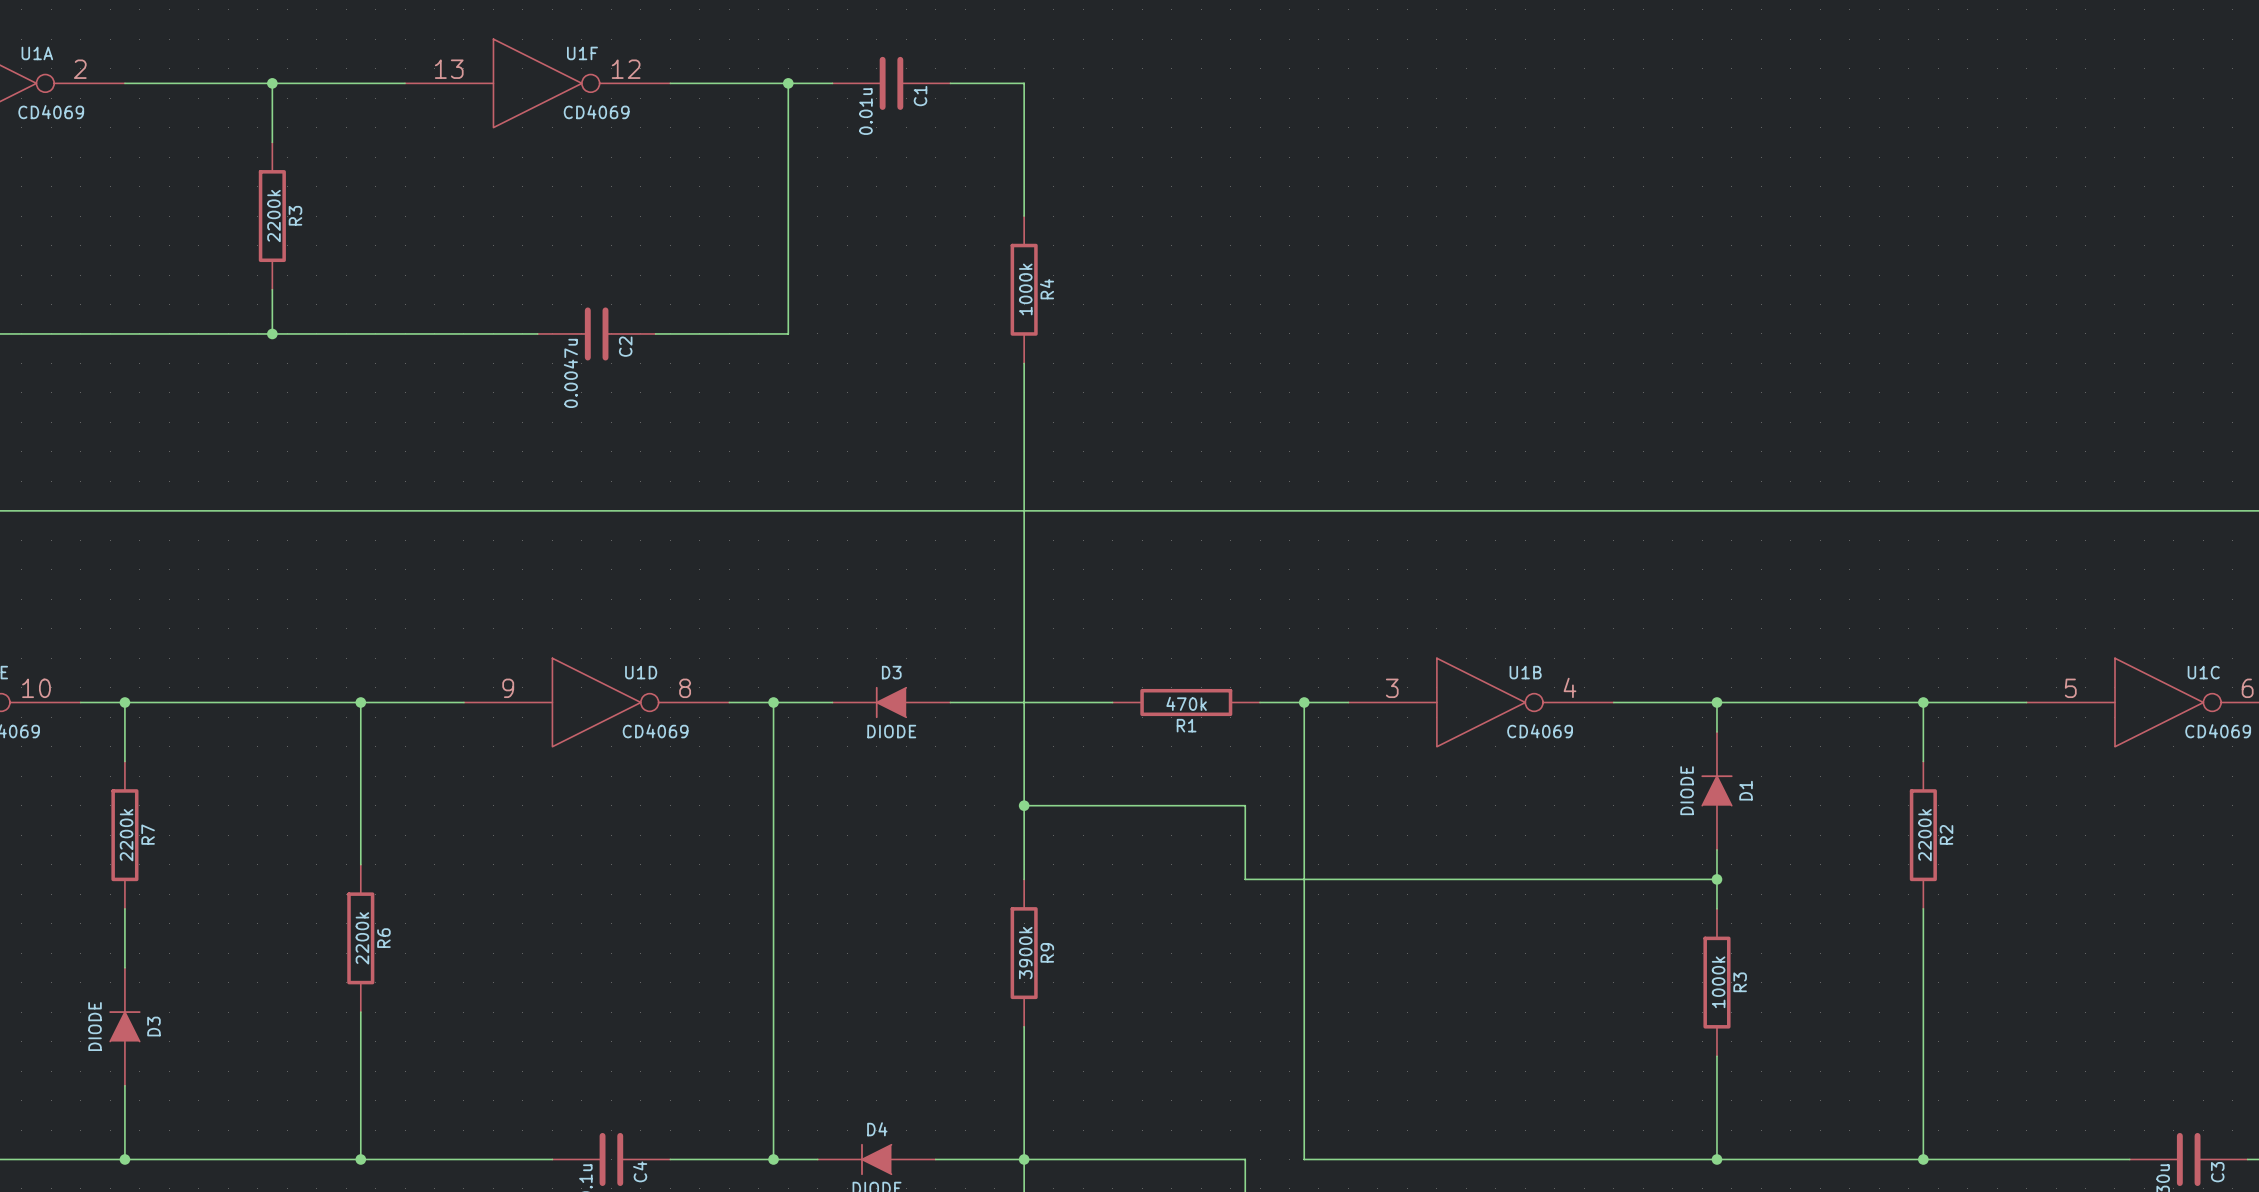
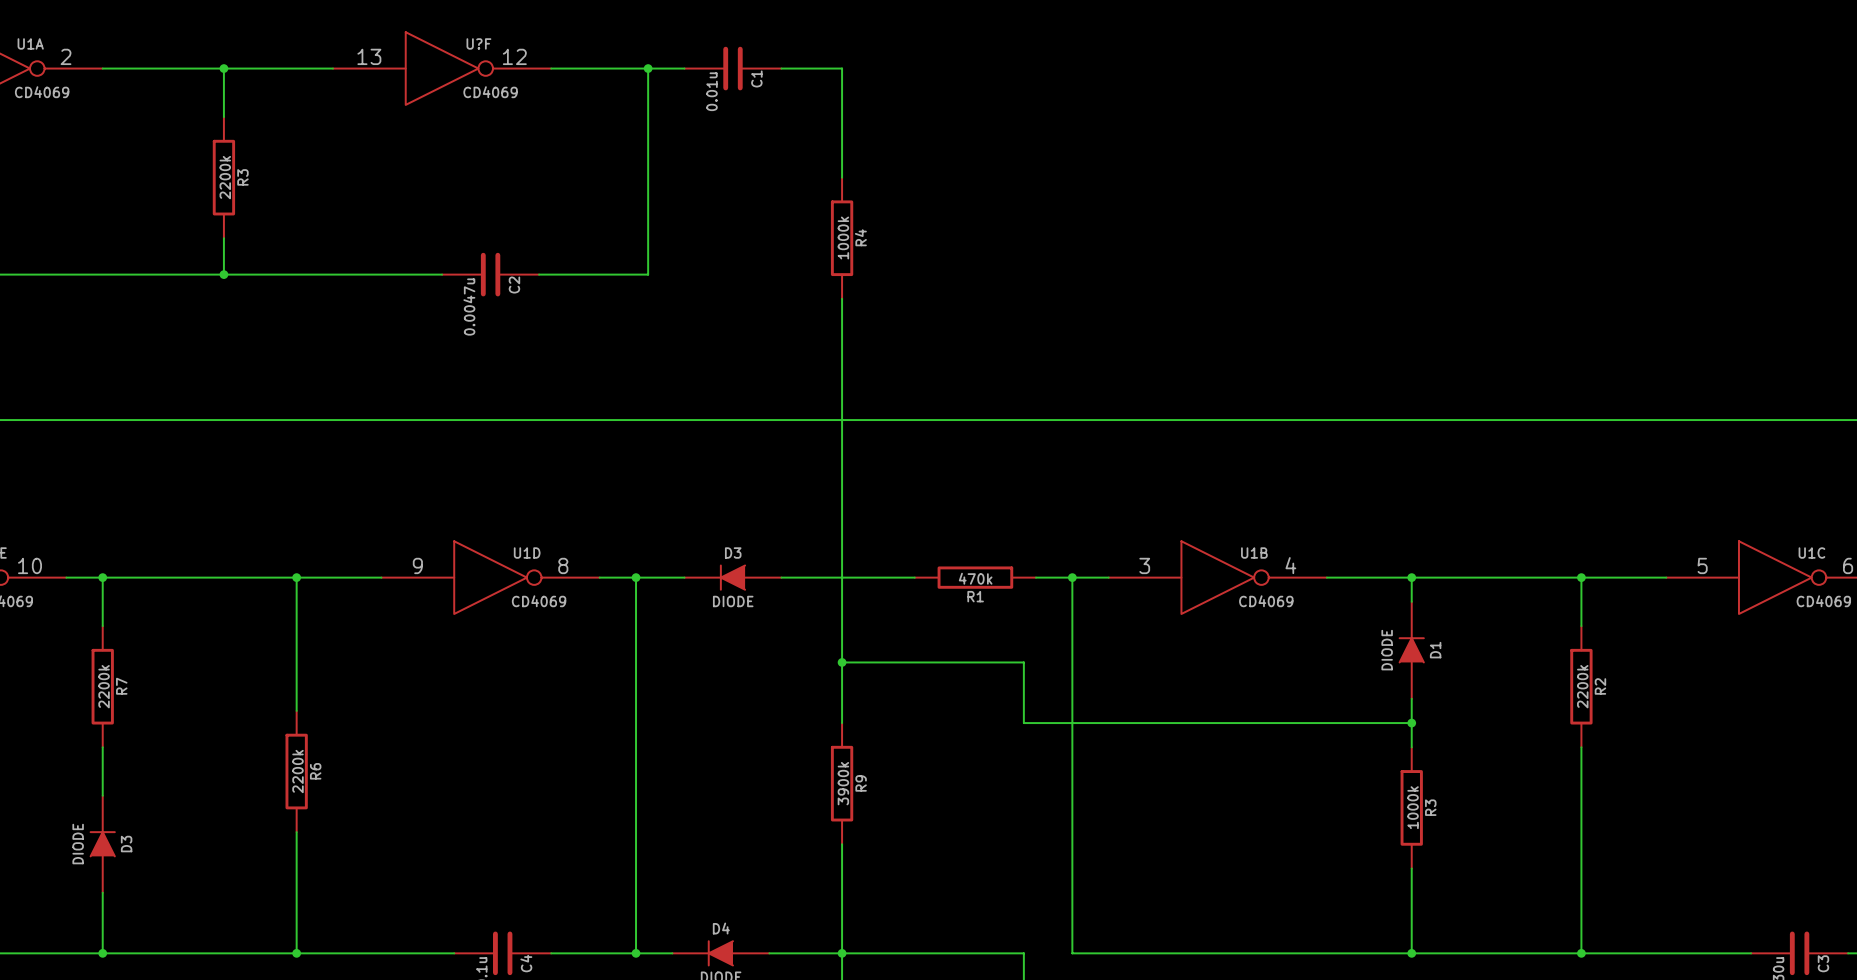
U1F name: U1F (582, 53) -> U?F (478, 43)

